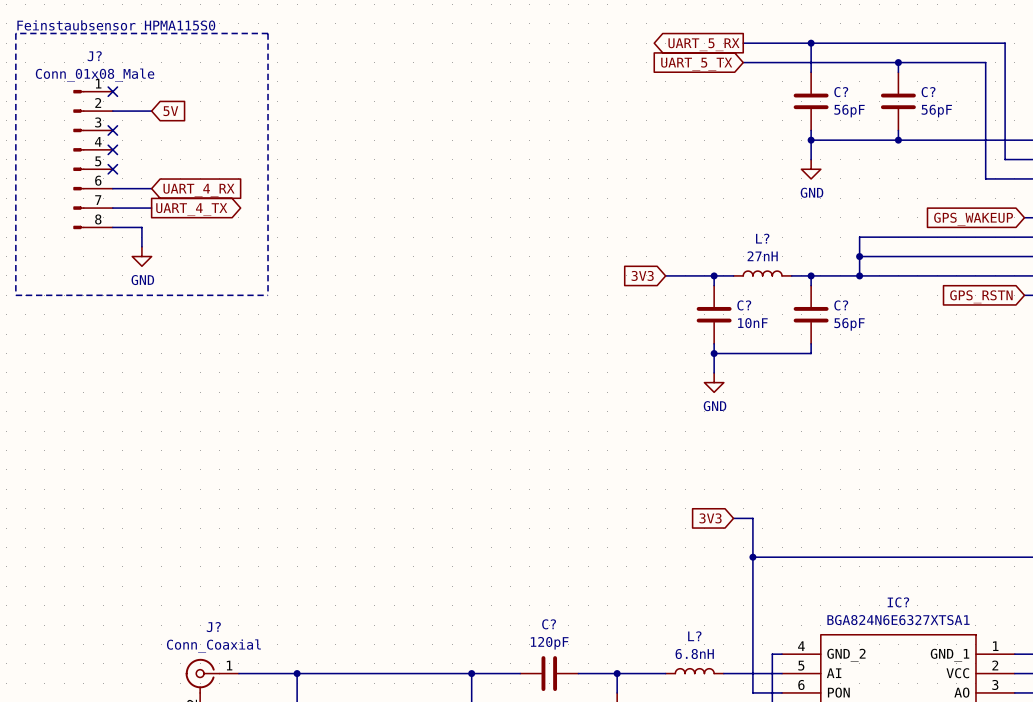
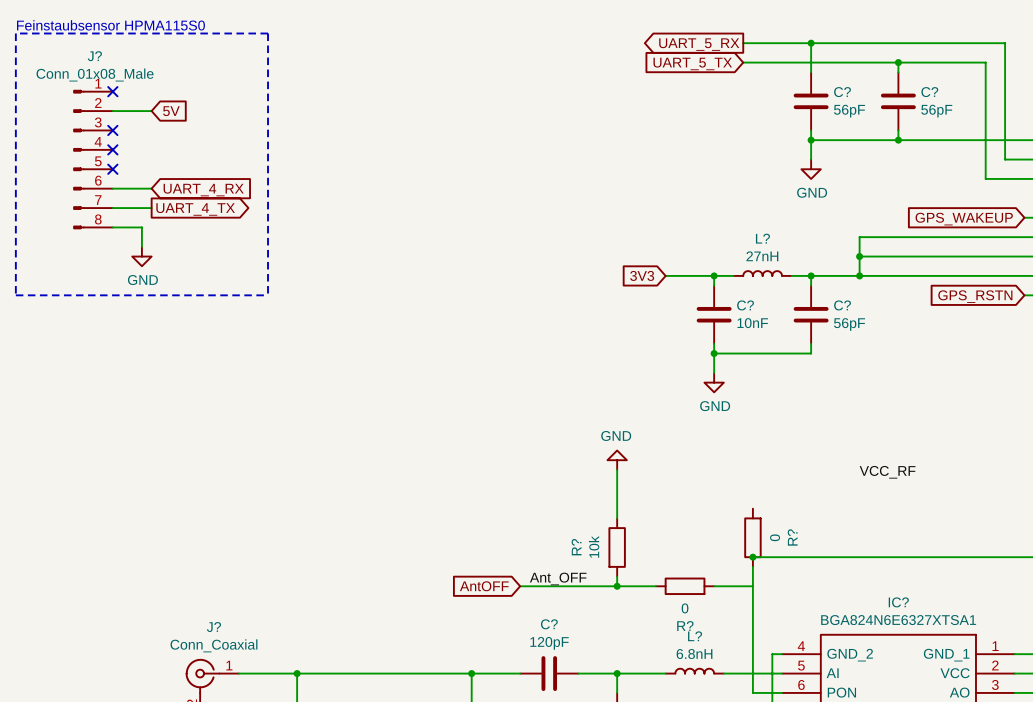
power symbol: none -> GND (617, 460)
wire: none -> (617, 469) (617, 518)
label: none -> VCC_RF (887, 472)
global label: 3V3 (710, 518) -> none
wire: (733, 518) (752, 518) (752, 566) -> none
R?: none -> 0 (752, 537)
R?: none -> 10k (617, 547)
wire: none -> (617, 576) (617, 586)
label: none -> Ant_OFF (558, 578)
global label: none -> AntOFF (484, 586)
wire: none -> (520, 586) (655, 586)
junction: none -> (617, 586)
R?: none -> 0 (685, 586)
wire: none -> (714, 586) (752, 586)

